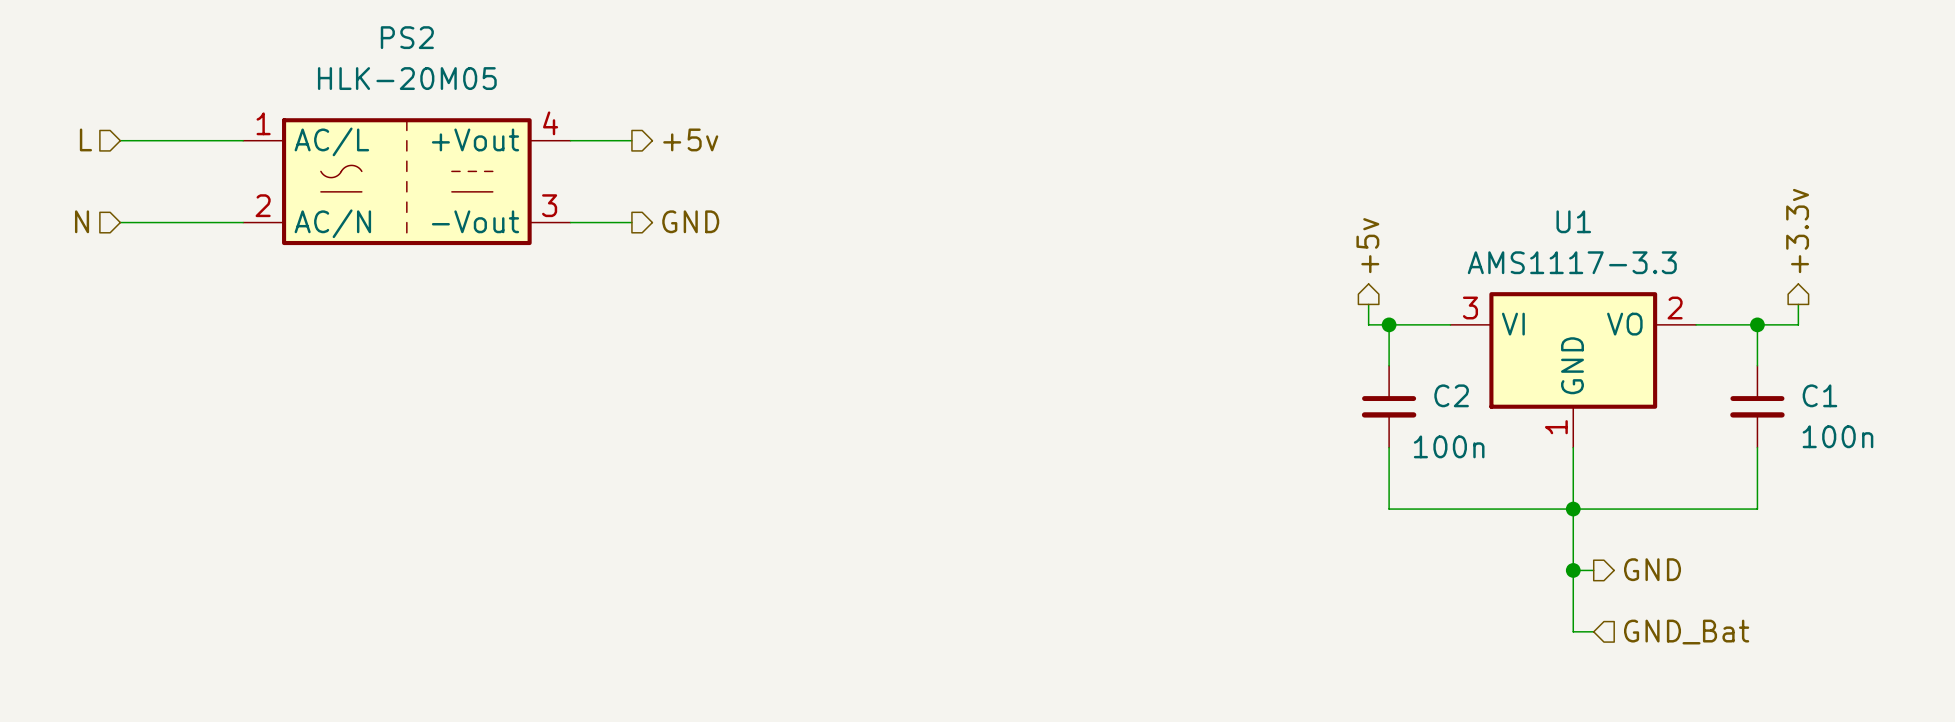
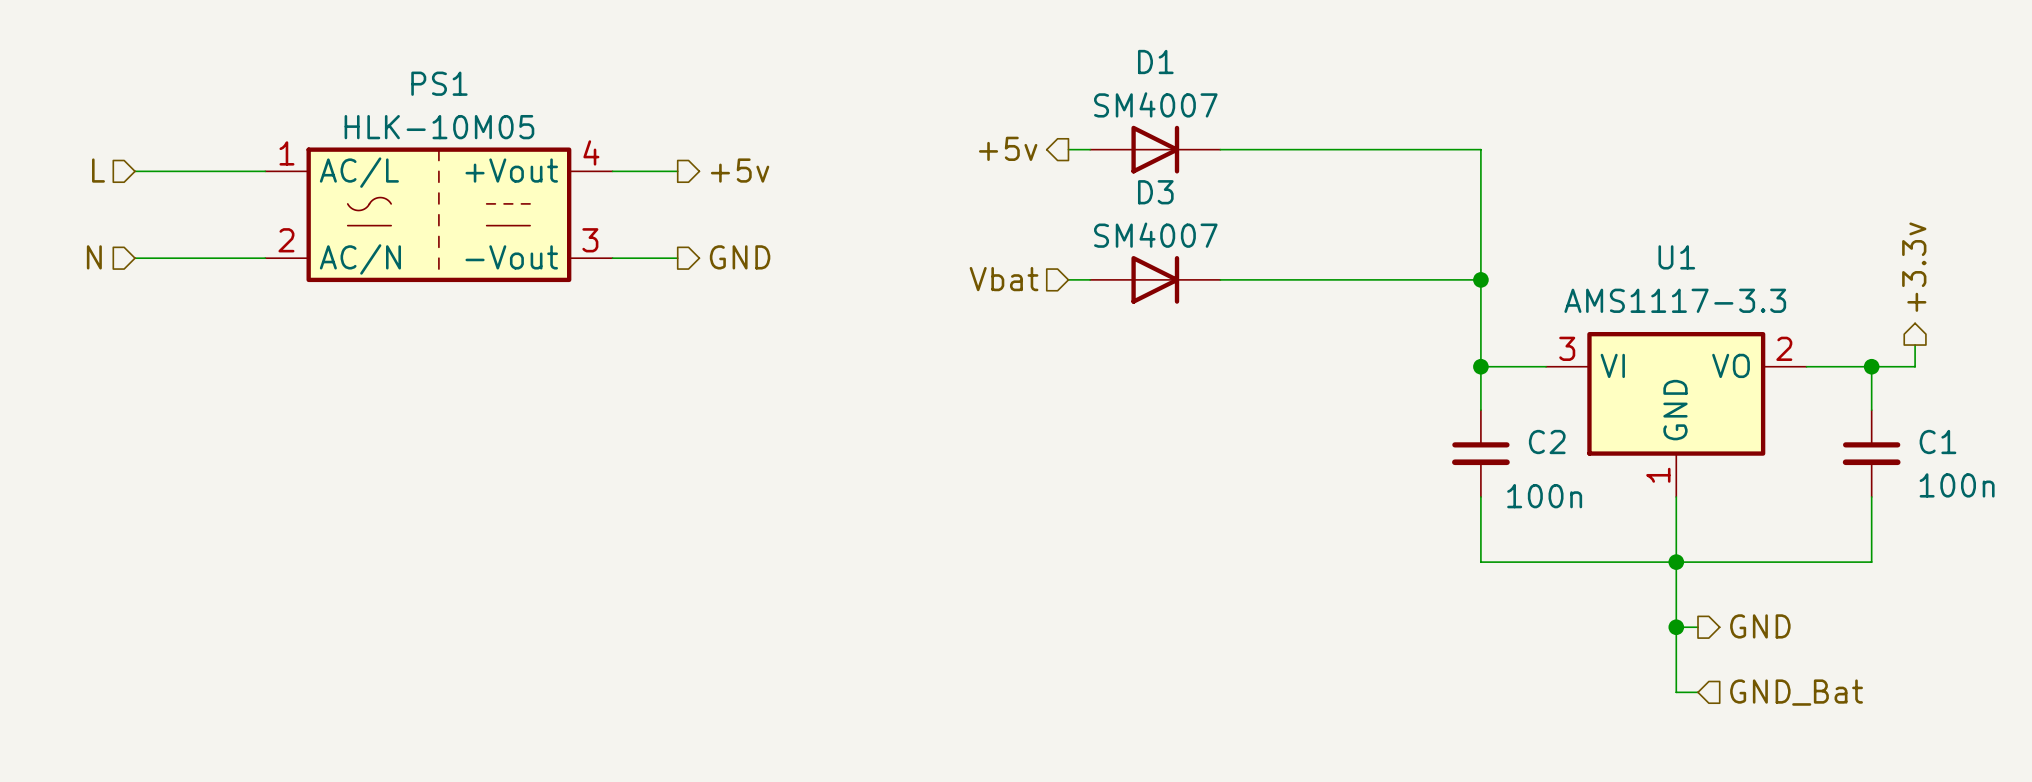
PS2 name: PS2 (407, 37) -> PS1 (439, 83)
PS2 value: HLK-20M05 (407, 78) -> HLK-10M05 (439, 127)
hierarchical label: none -> +5v (1008, 148)
wire: none -> (1068, 149) (1090, 149)
D1: none -> SM4007 (1155, 149)
hierarchical label: none -> Vbat (1004, 279)
wire: none -> (1068, 279) (1090, 279)
D3: none -> SM4007 (1155, 279)
wire: none -> (1220, 279) (1480, 279)
junction: none -> (1480, 279)
hierarchical label: +5v (1367, 245) -> none
wire: (1368, 304) (1368, 324) (1389, 324) -> (1220, 149) (1480, 149) (1480, 366)

